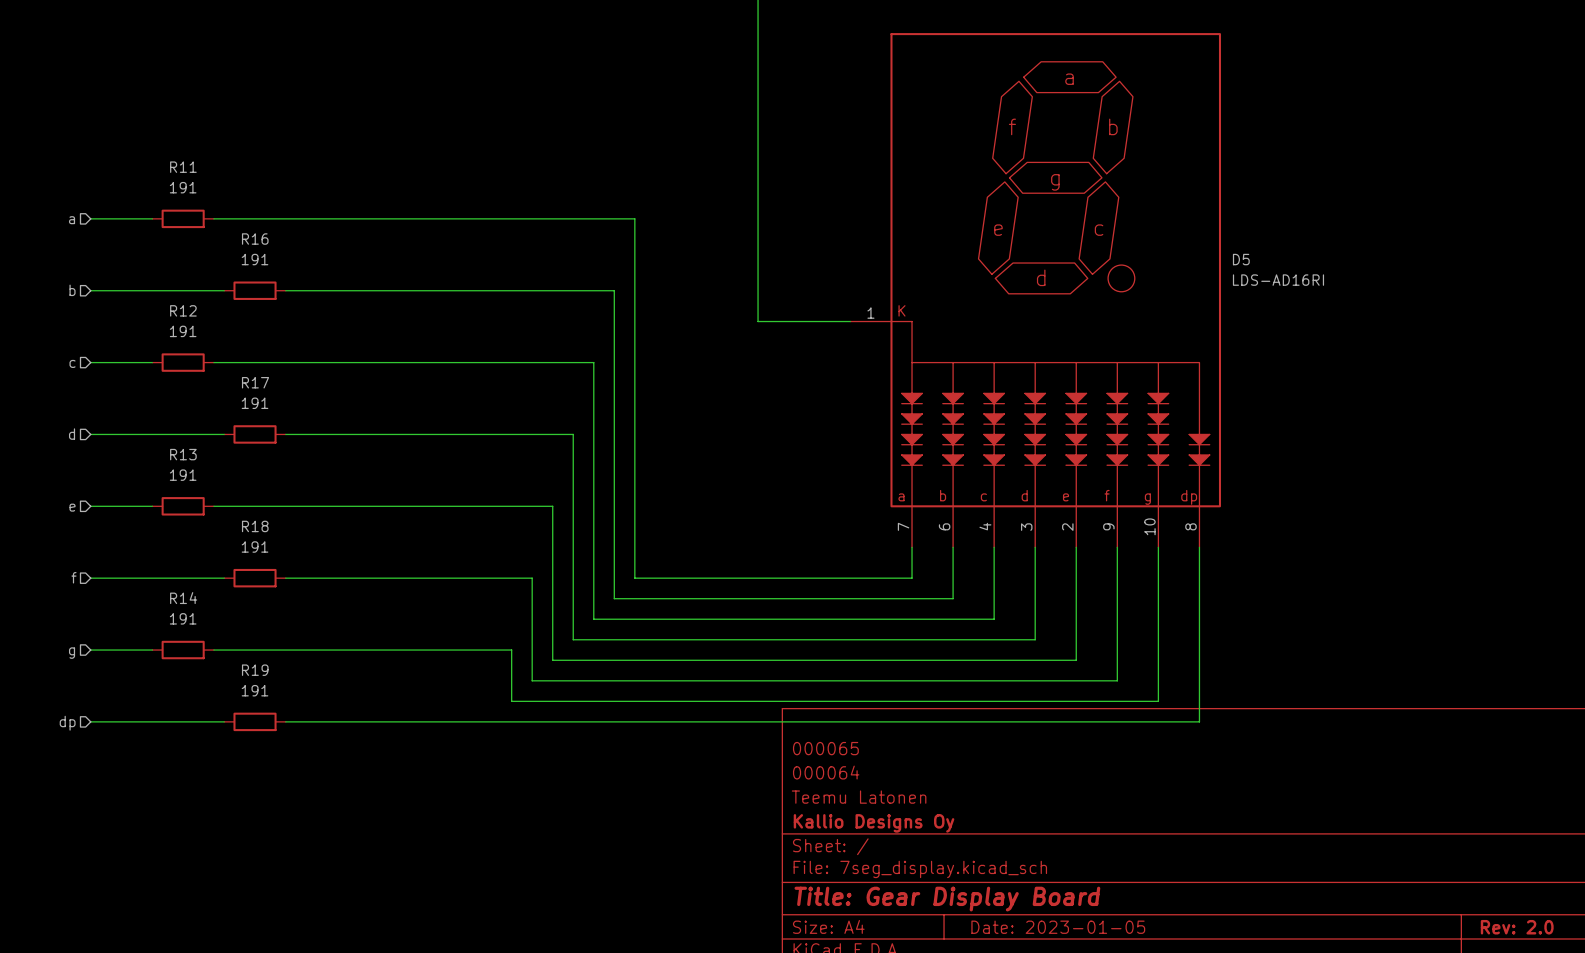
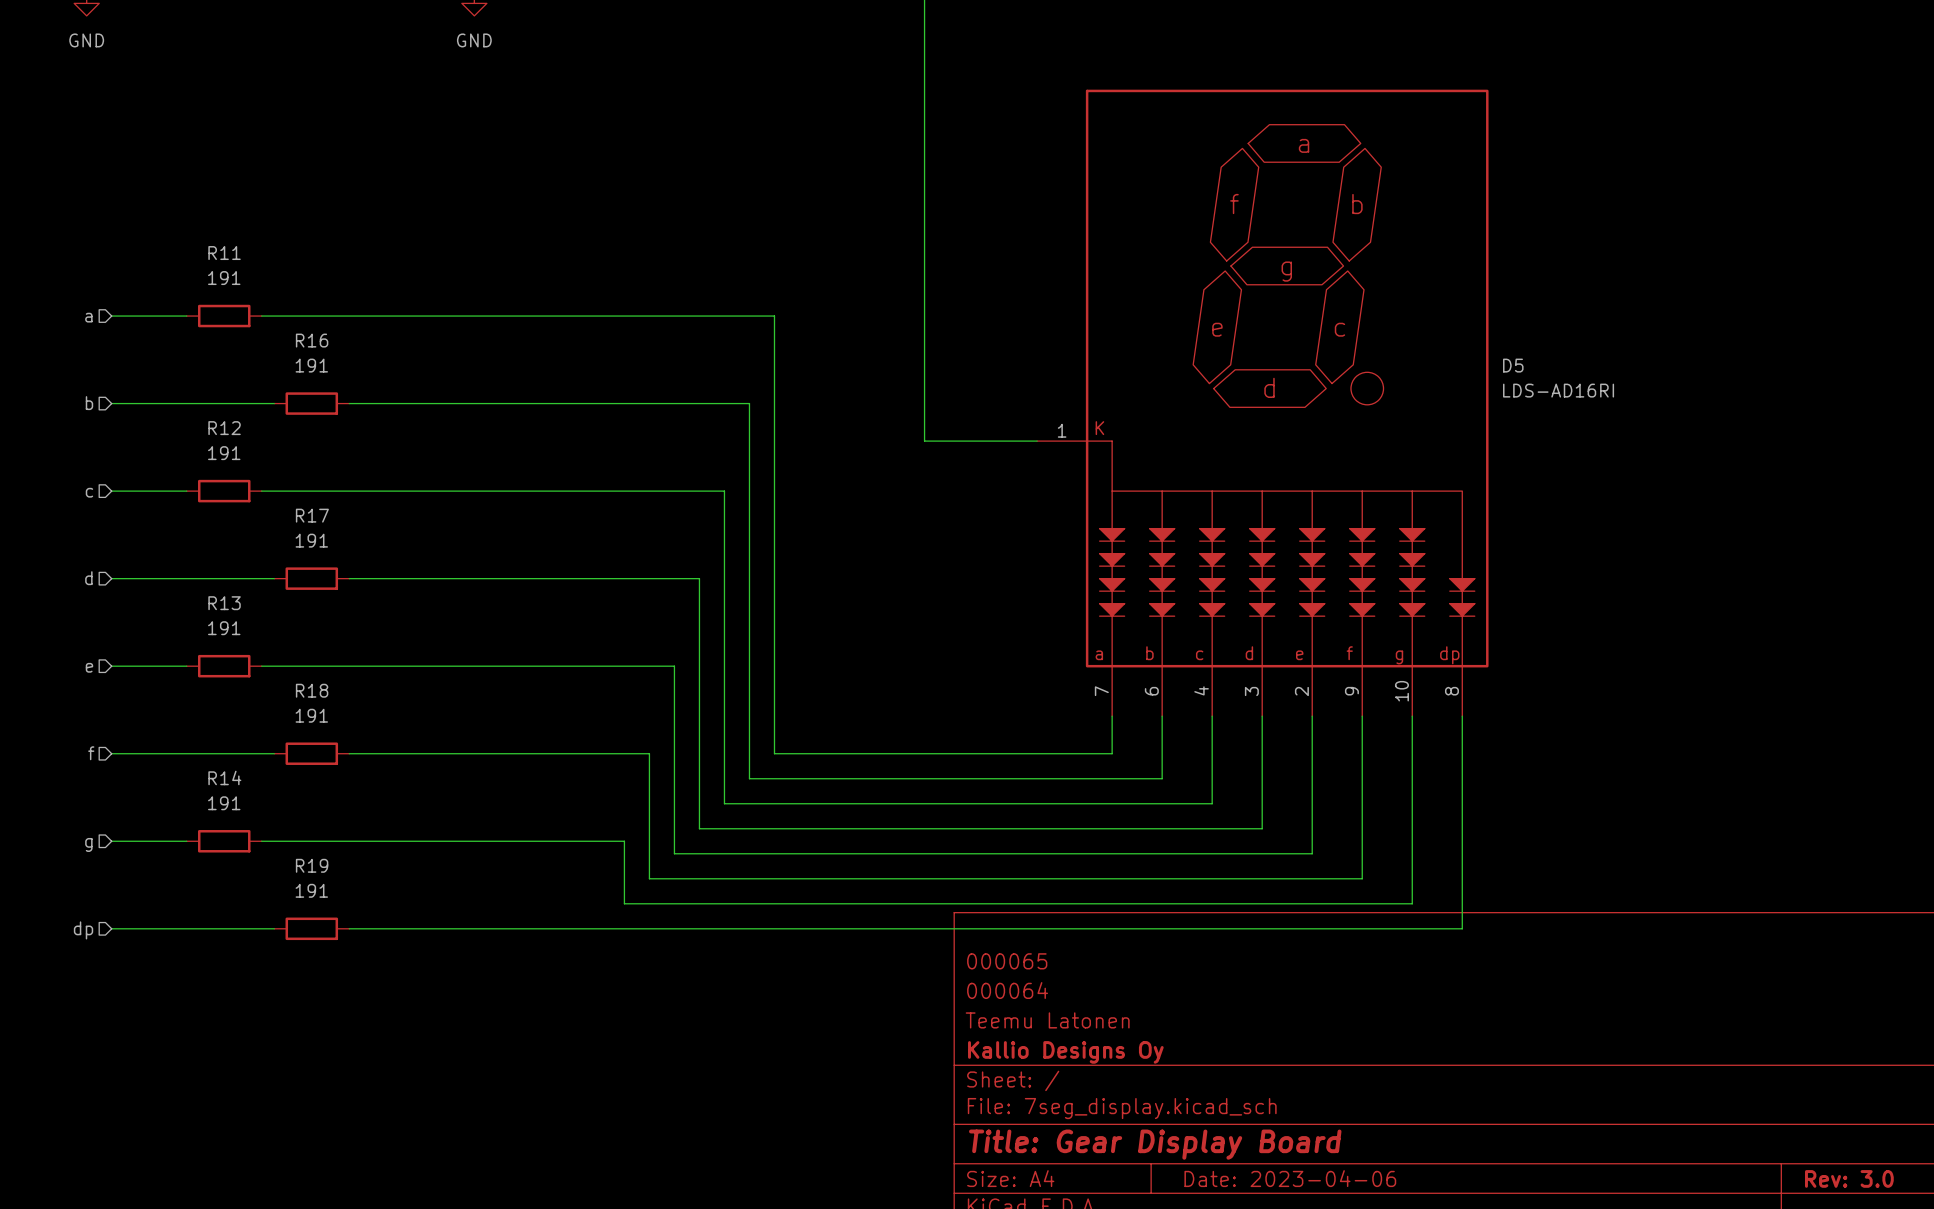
title block: Date: 2023-01-05 (1058, 927) -> Date: 2023-04-06 (1290, 1178)
title block: Rev: 2.0 (1517, 927) -> Rev: 3.0 (1849, 1178)

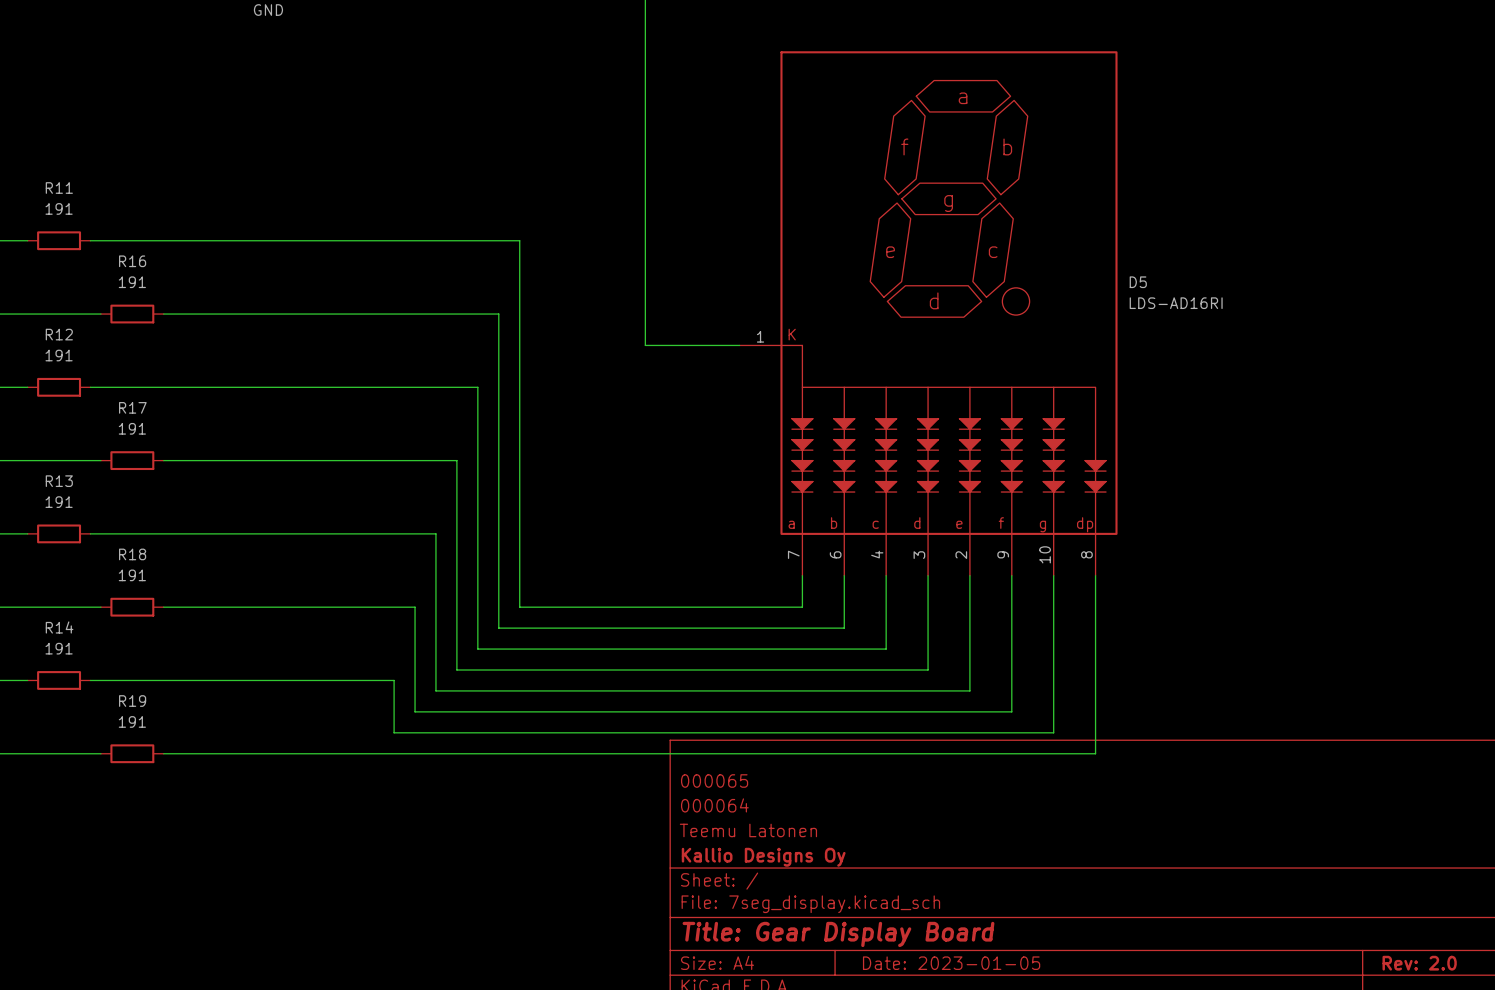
title block: Date: 2023-04-06 (1290, 1178) -> Date: 2023-01-05 (951, 963)
title block: Rev: 3.0 (1849, 1178) -> Rev: 2.0 (1419, 963)

